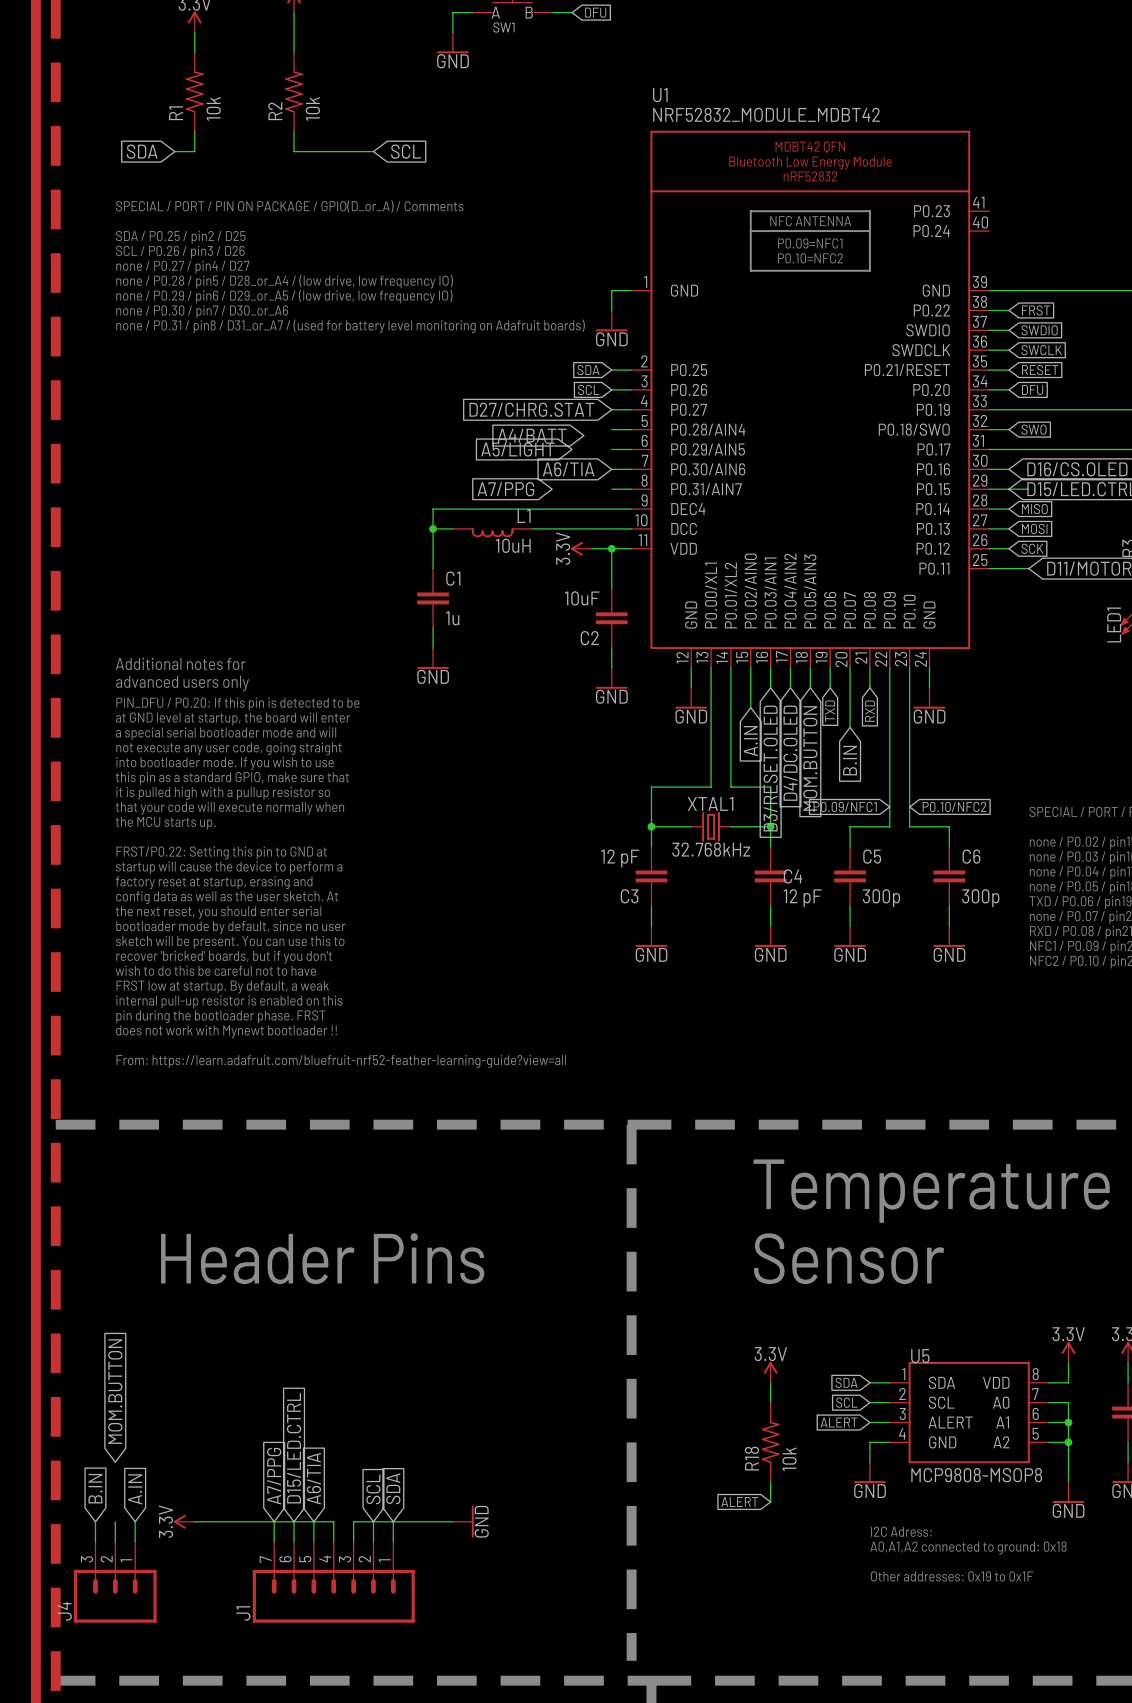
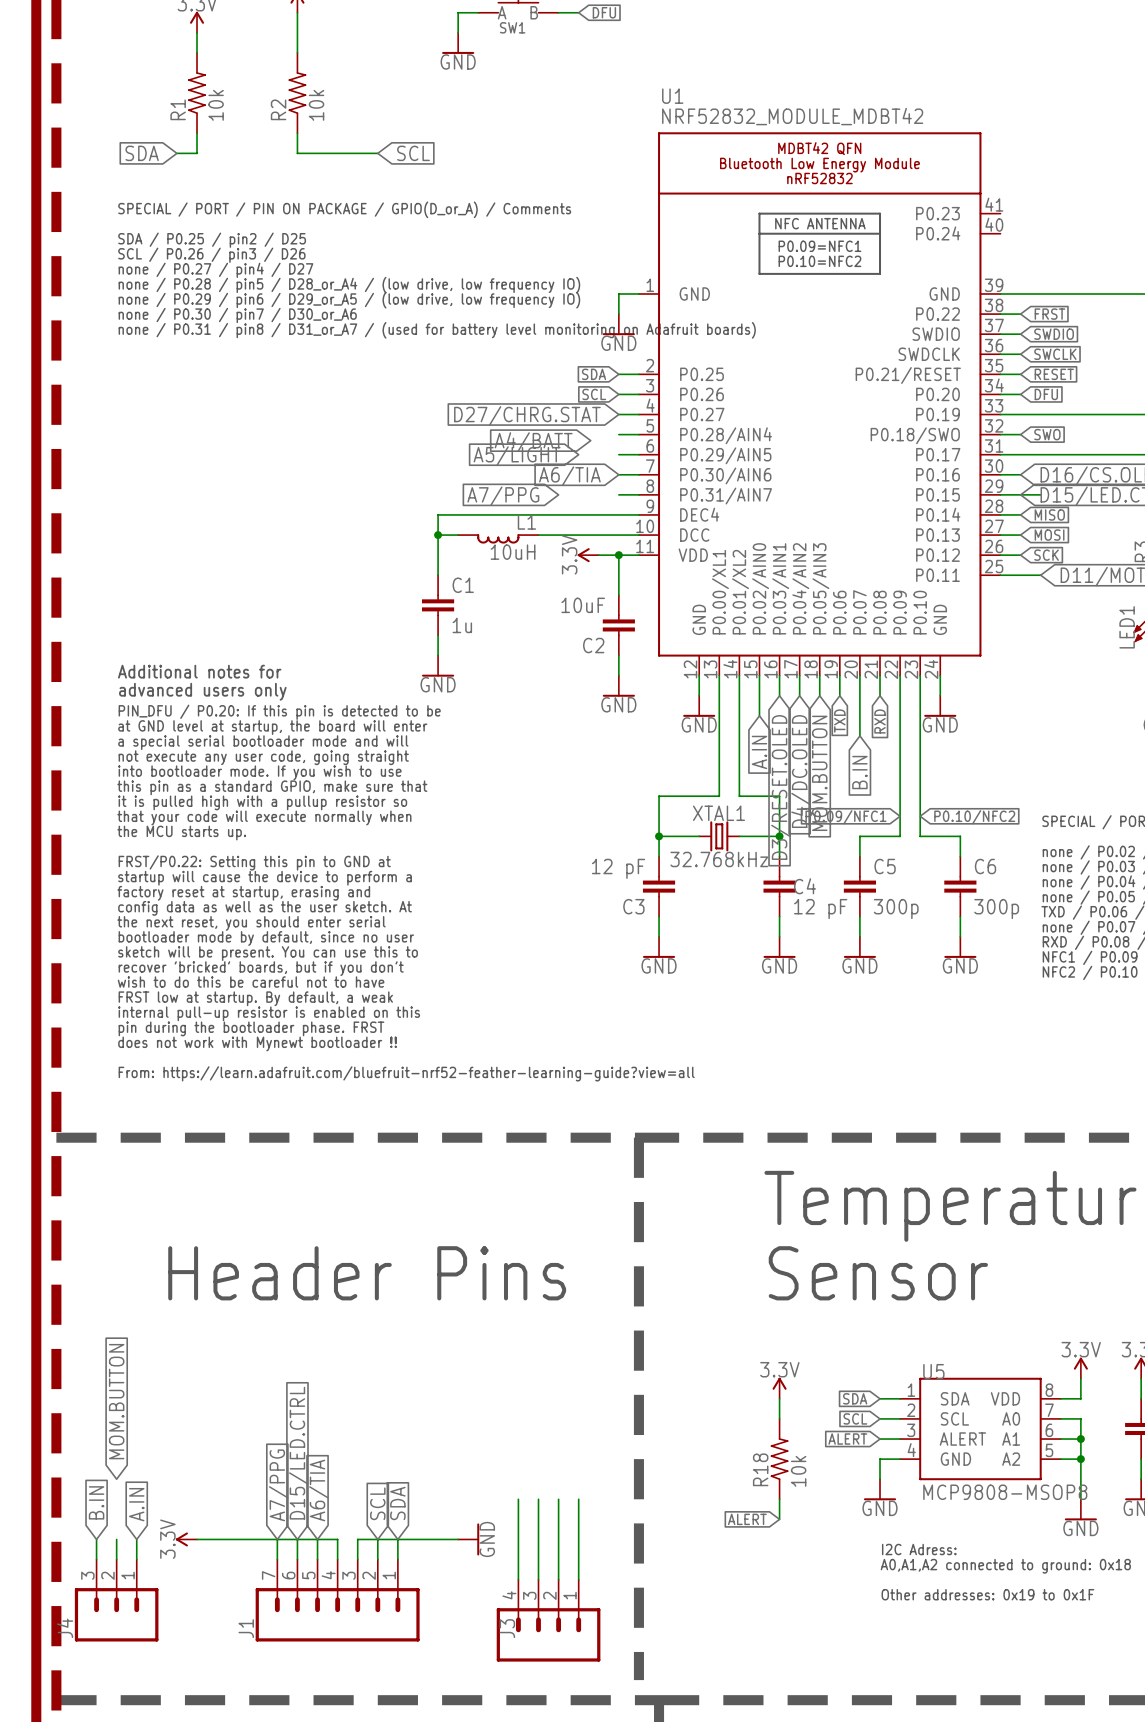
wire: none -> (518, 1499) (518, 1579)
wire: none -> (538, 1499) (538, 1579)
wire: none -> (558, 1499) (558, 1579)
wire: none -> (578, 1499) (578, 1579)
J3: none -> (548, 1620)

